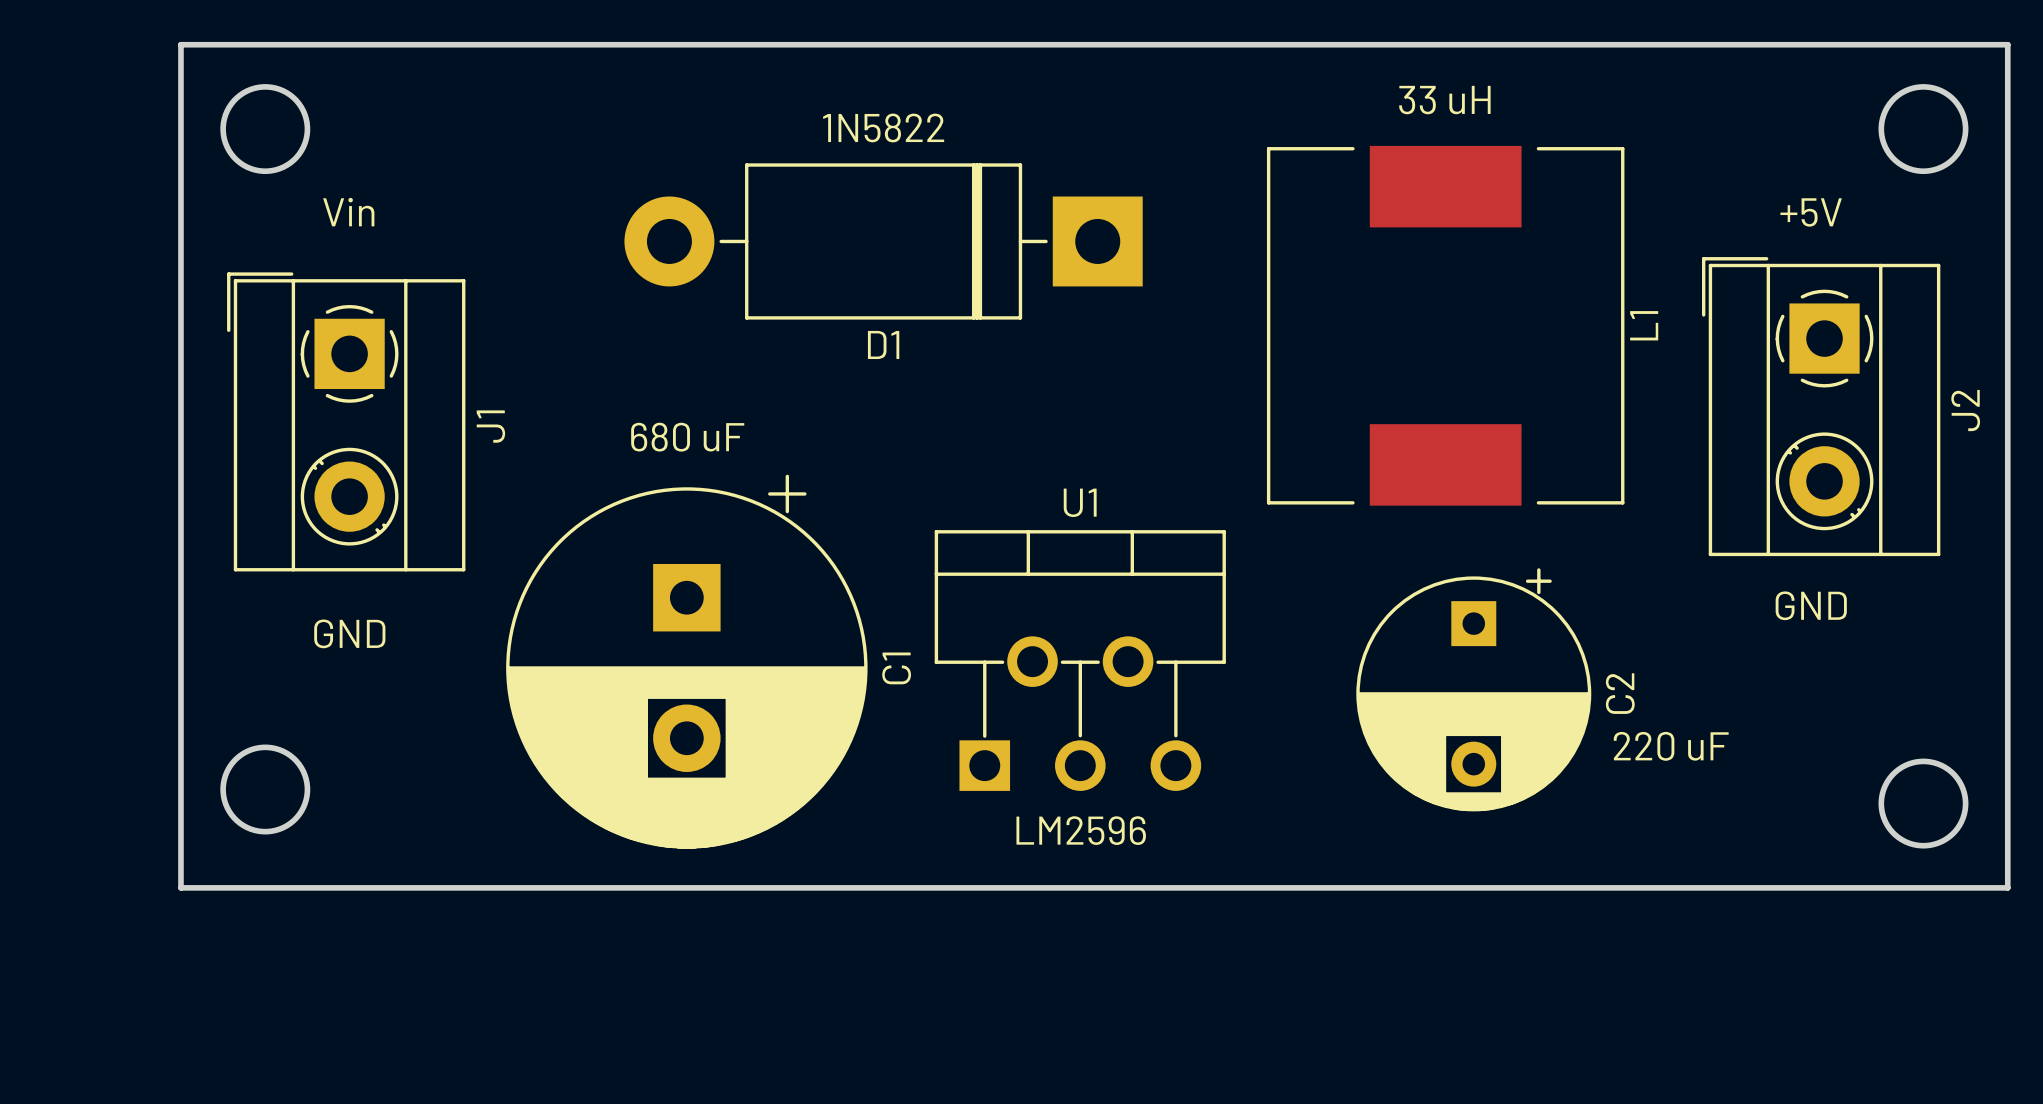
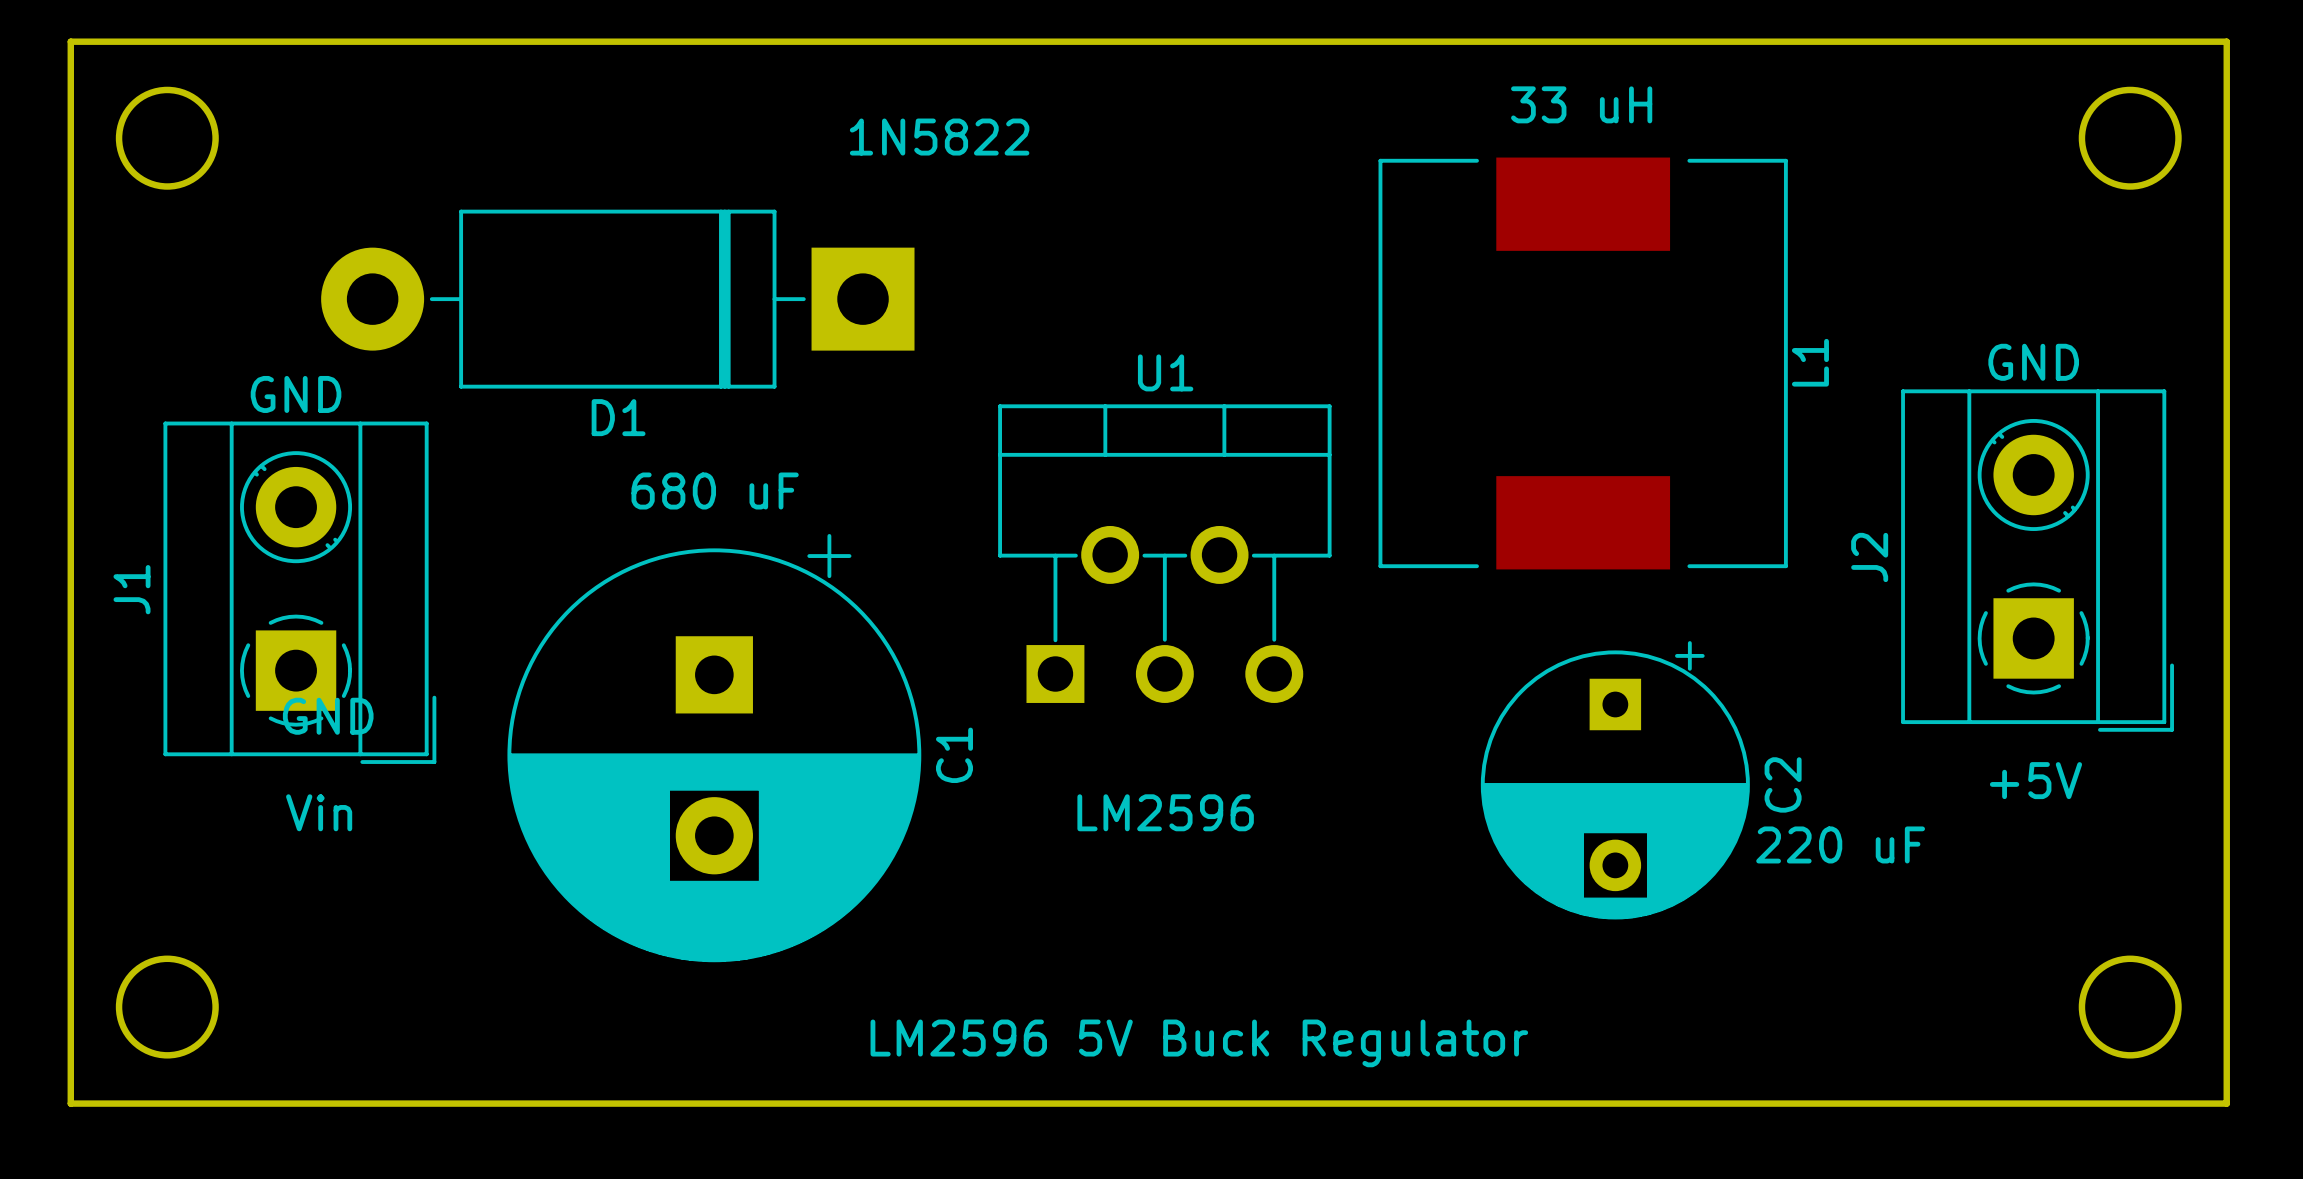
board edge: (180, 44) (180, 887) (2007, 887) -> (135, 41) (70, 41) (70, 1103) (2226, 1103) (2226, 1007)
round board edge position: (265, 129) -> (167, 138)
text position: Vin (348, 212) -> Vin (319, 812)
text position: +5V (1811, 212) -> +5V (2035, 780)
D1 position: (883, 241) -> (617, 299)
text: none -> GND (296, 394)
J2 rotation: 0° (1821, 406) -> 180° (2037, 560)
J1 rotation: 0° (346, 421) -> 180° (299, 592)
text position: GND (1811, 605) -> GND (2033, 362)
U1 position: (1080, 660) -> (1164, 553)
round board edge position: (265, 789) -> (167, 1007)
round board edge position: (1923, 803) -> (2130, 1007)
text position: LM2596 (1081, 830) -> LM2596 (1165, 812)
text: none -> LM2596 5V Buck Regulator (1199, 1043)

